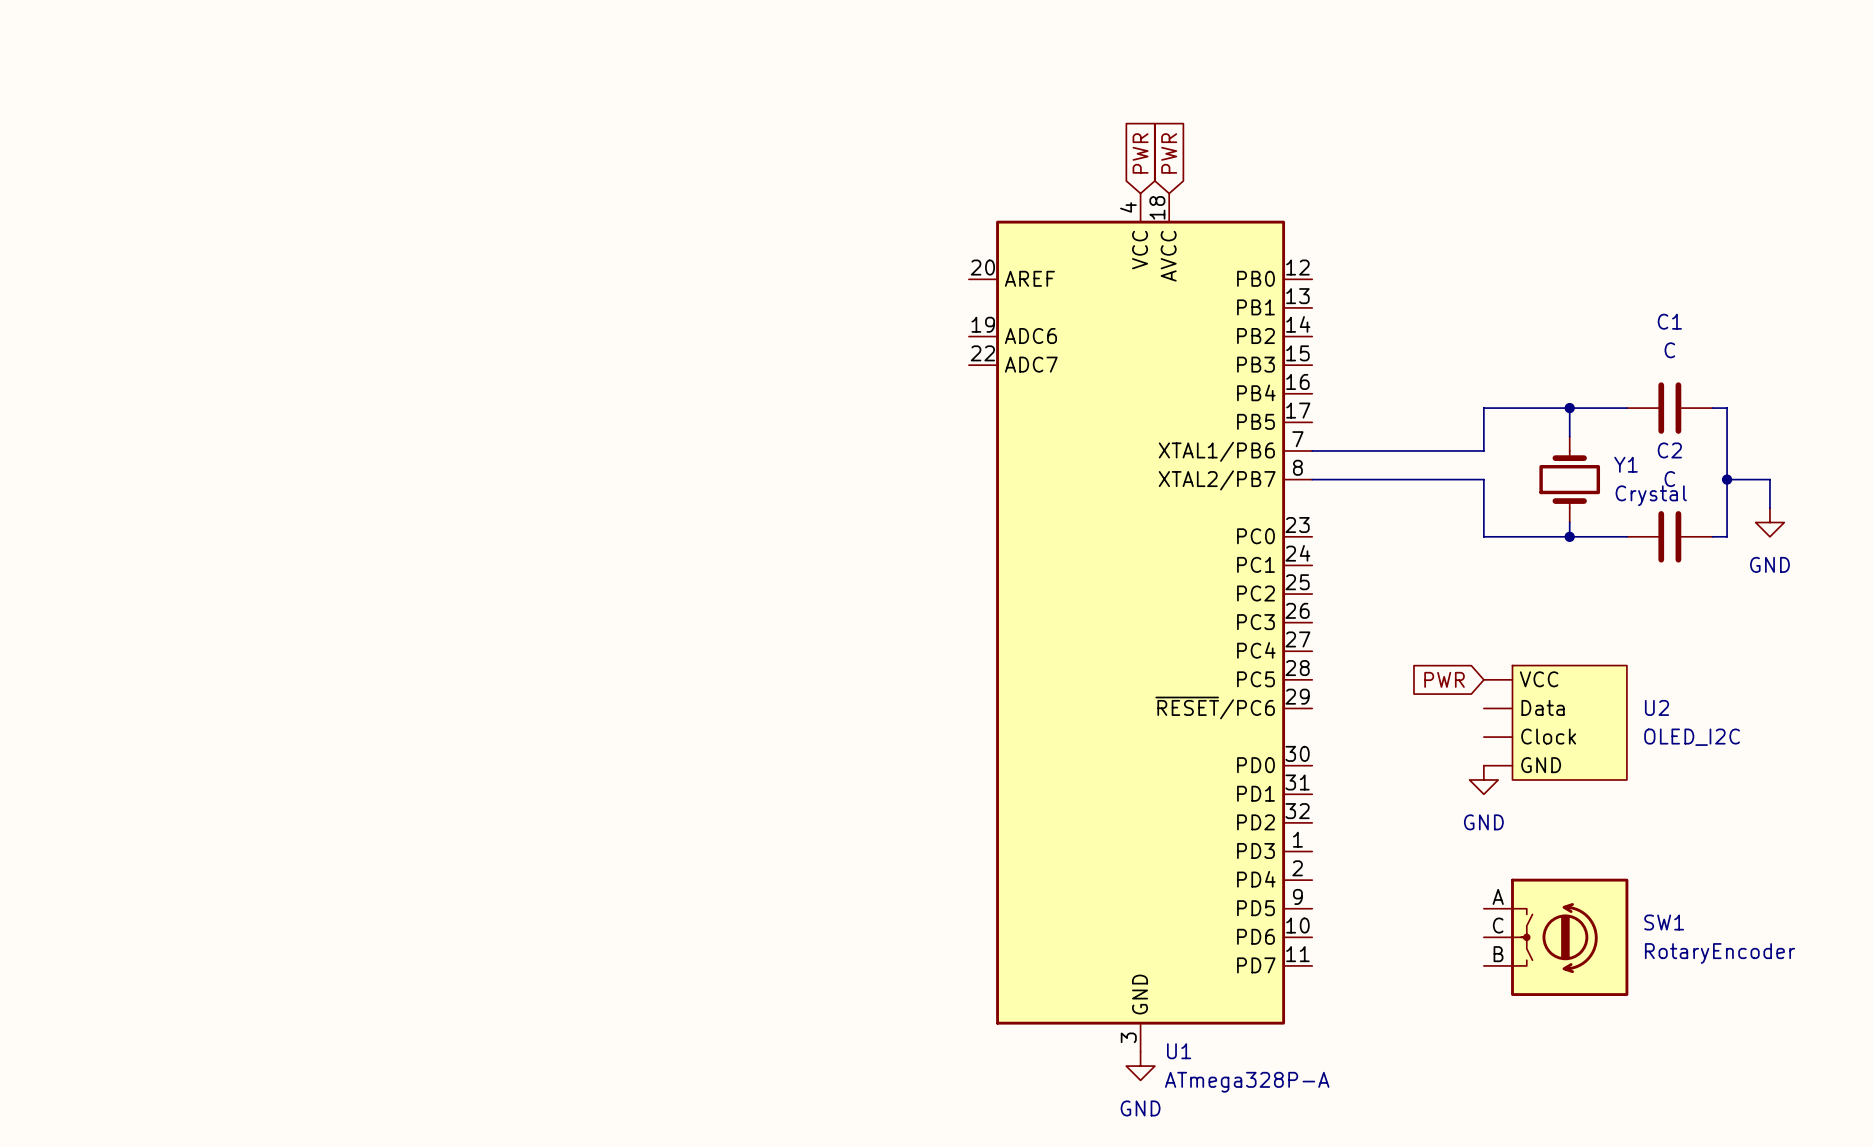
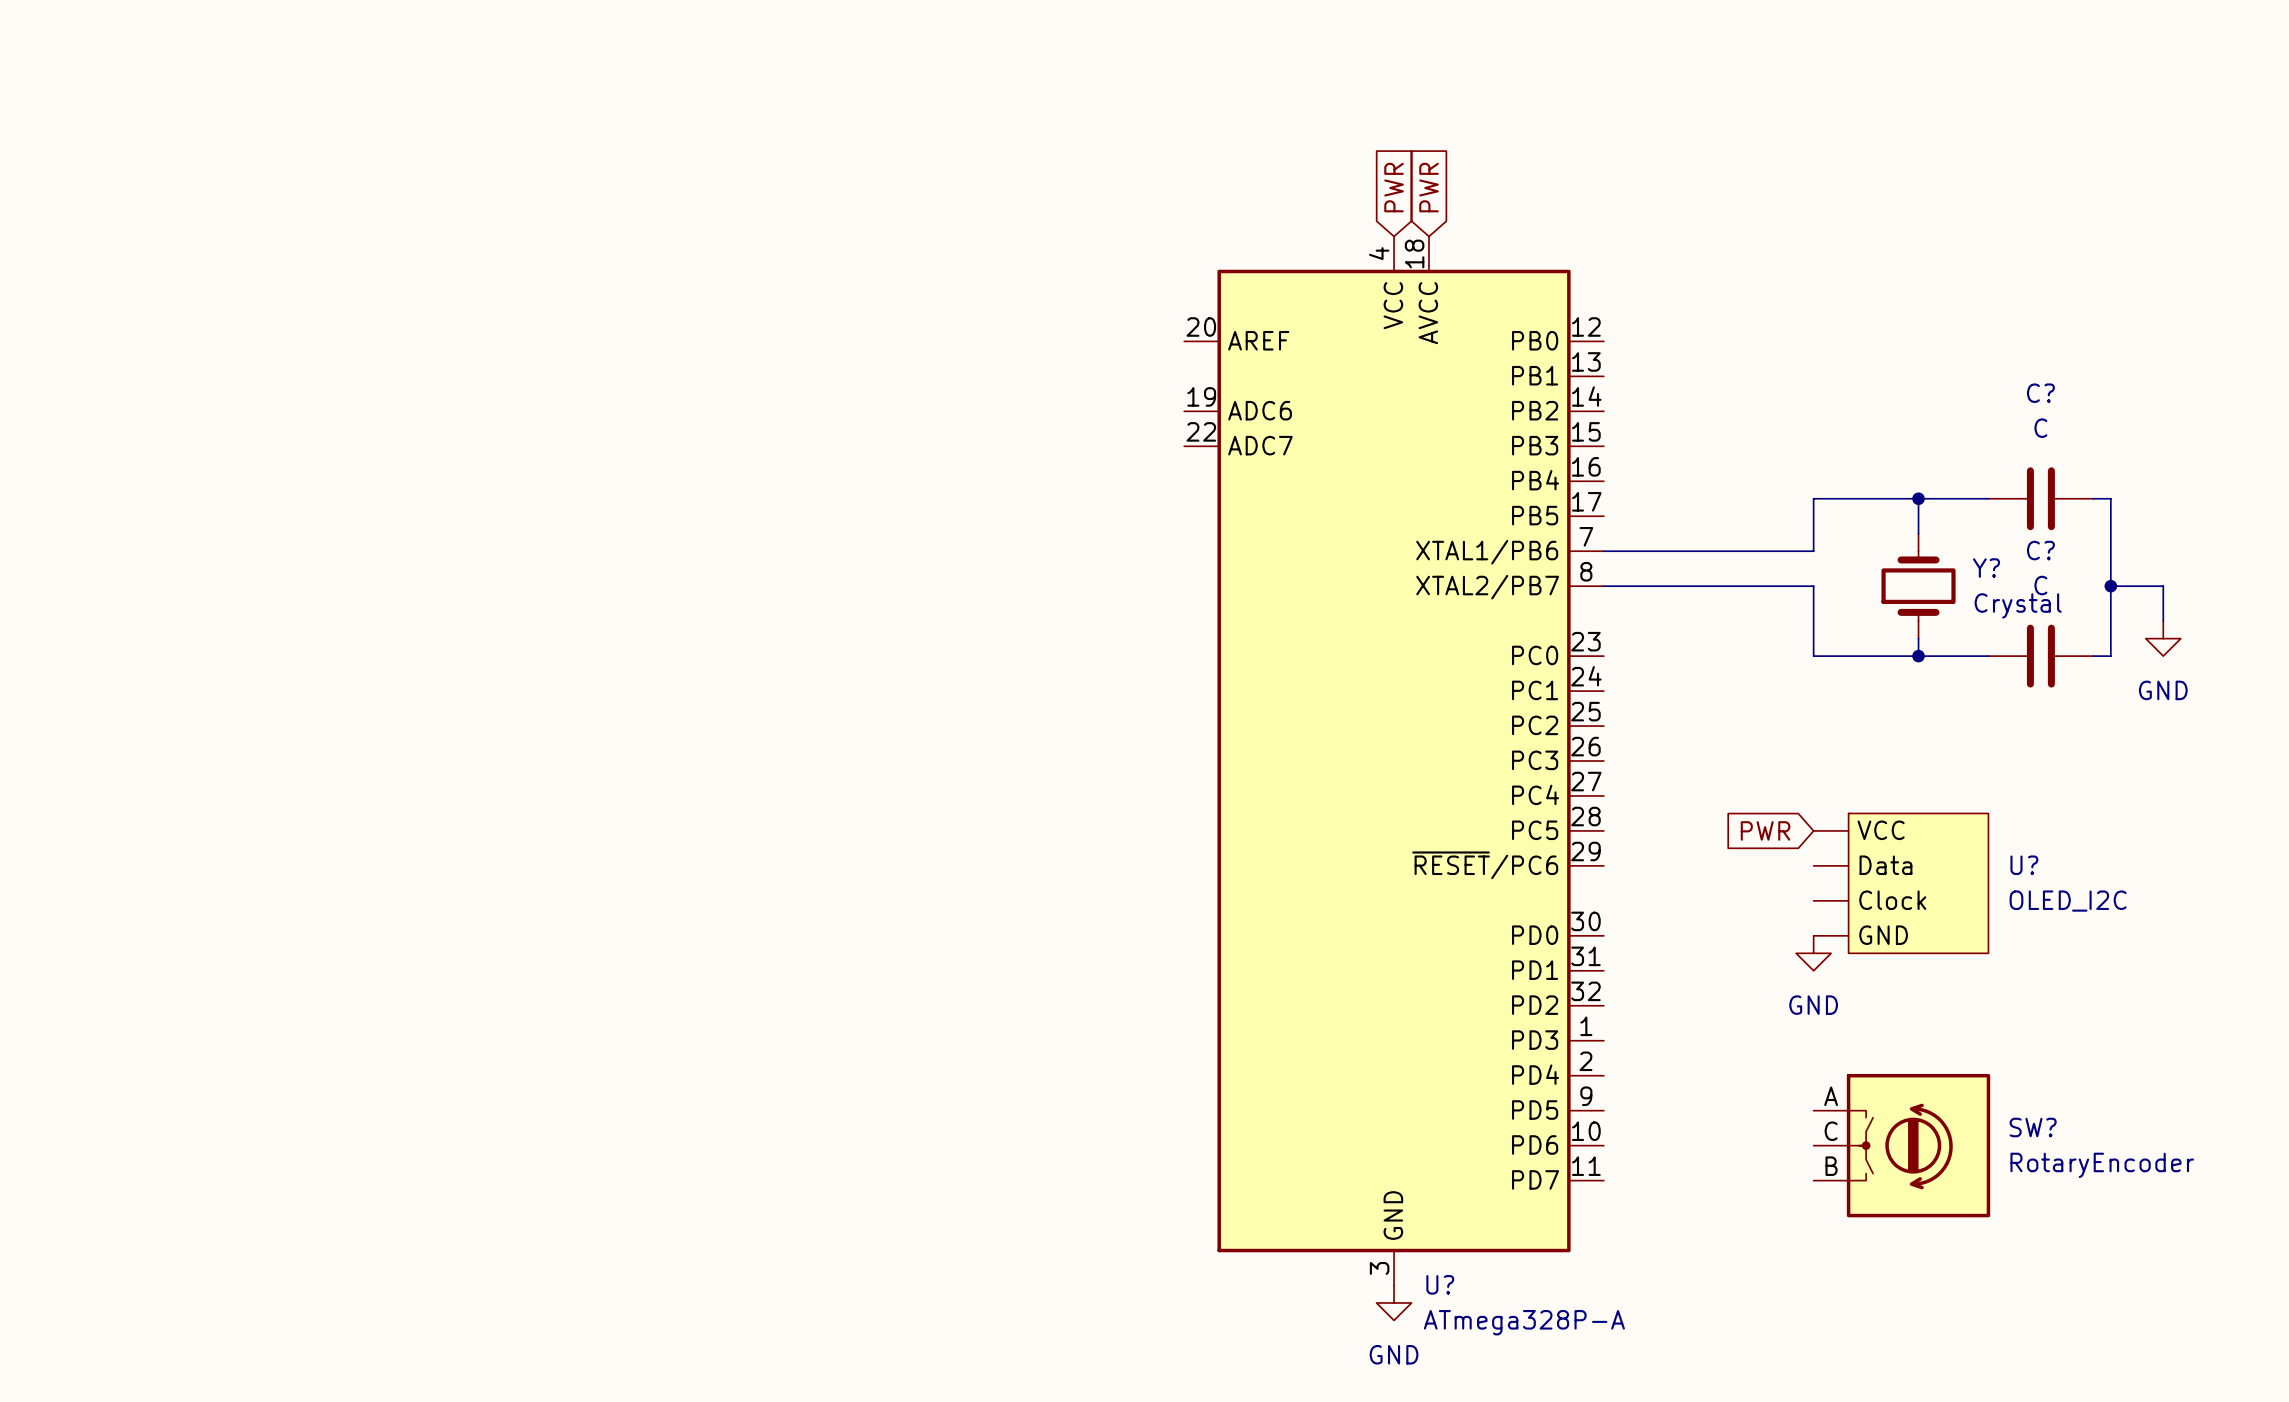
C1 name: C1 (1669, 321) -> C? (2040, 393)
C2 name: C2 (1669, 450) -> C? (2040, 550)
Y1 name: Y1 (1626, 464) -> Y? (1986, 568)
U2 name: U2 (1657, 707) -> U? (2024, 865)
SW1 name: SW1 (1664, 922) -> SW? (2033, 1127)
U1 name: U1 (1179, 1051) -> U? (1440, 1284)

